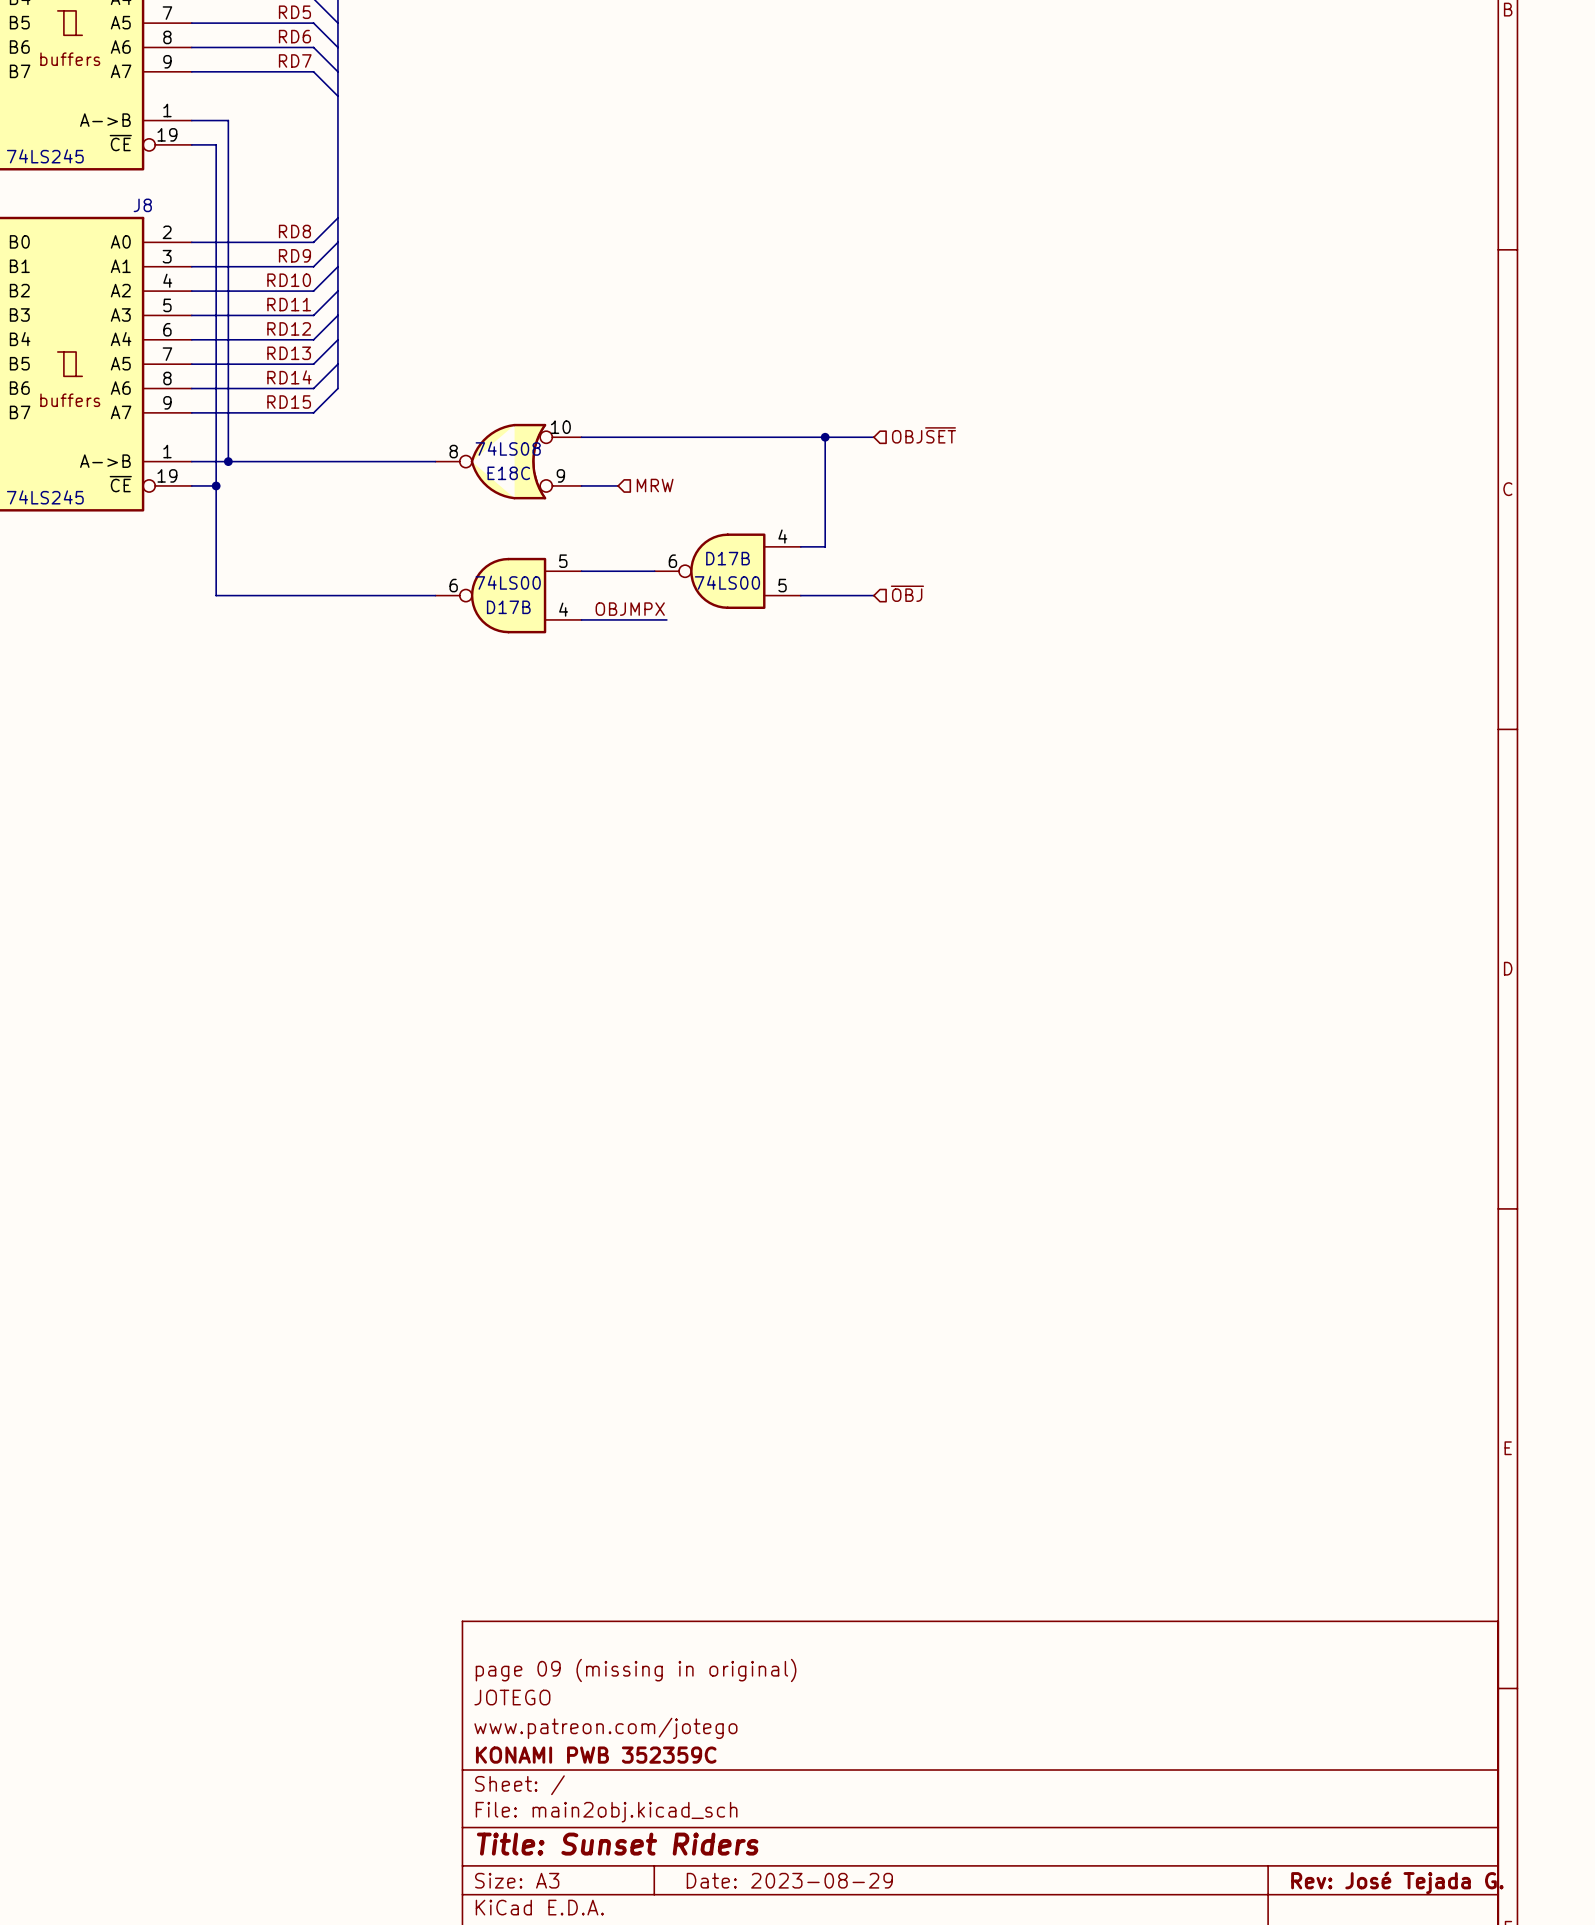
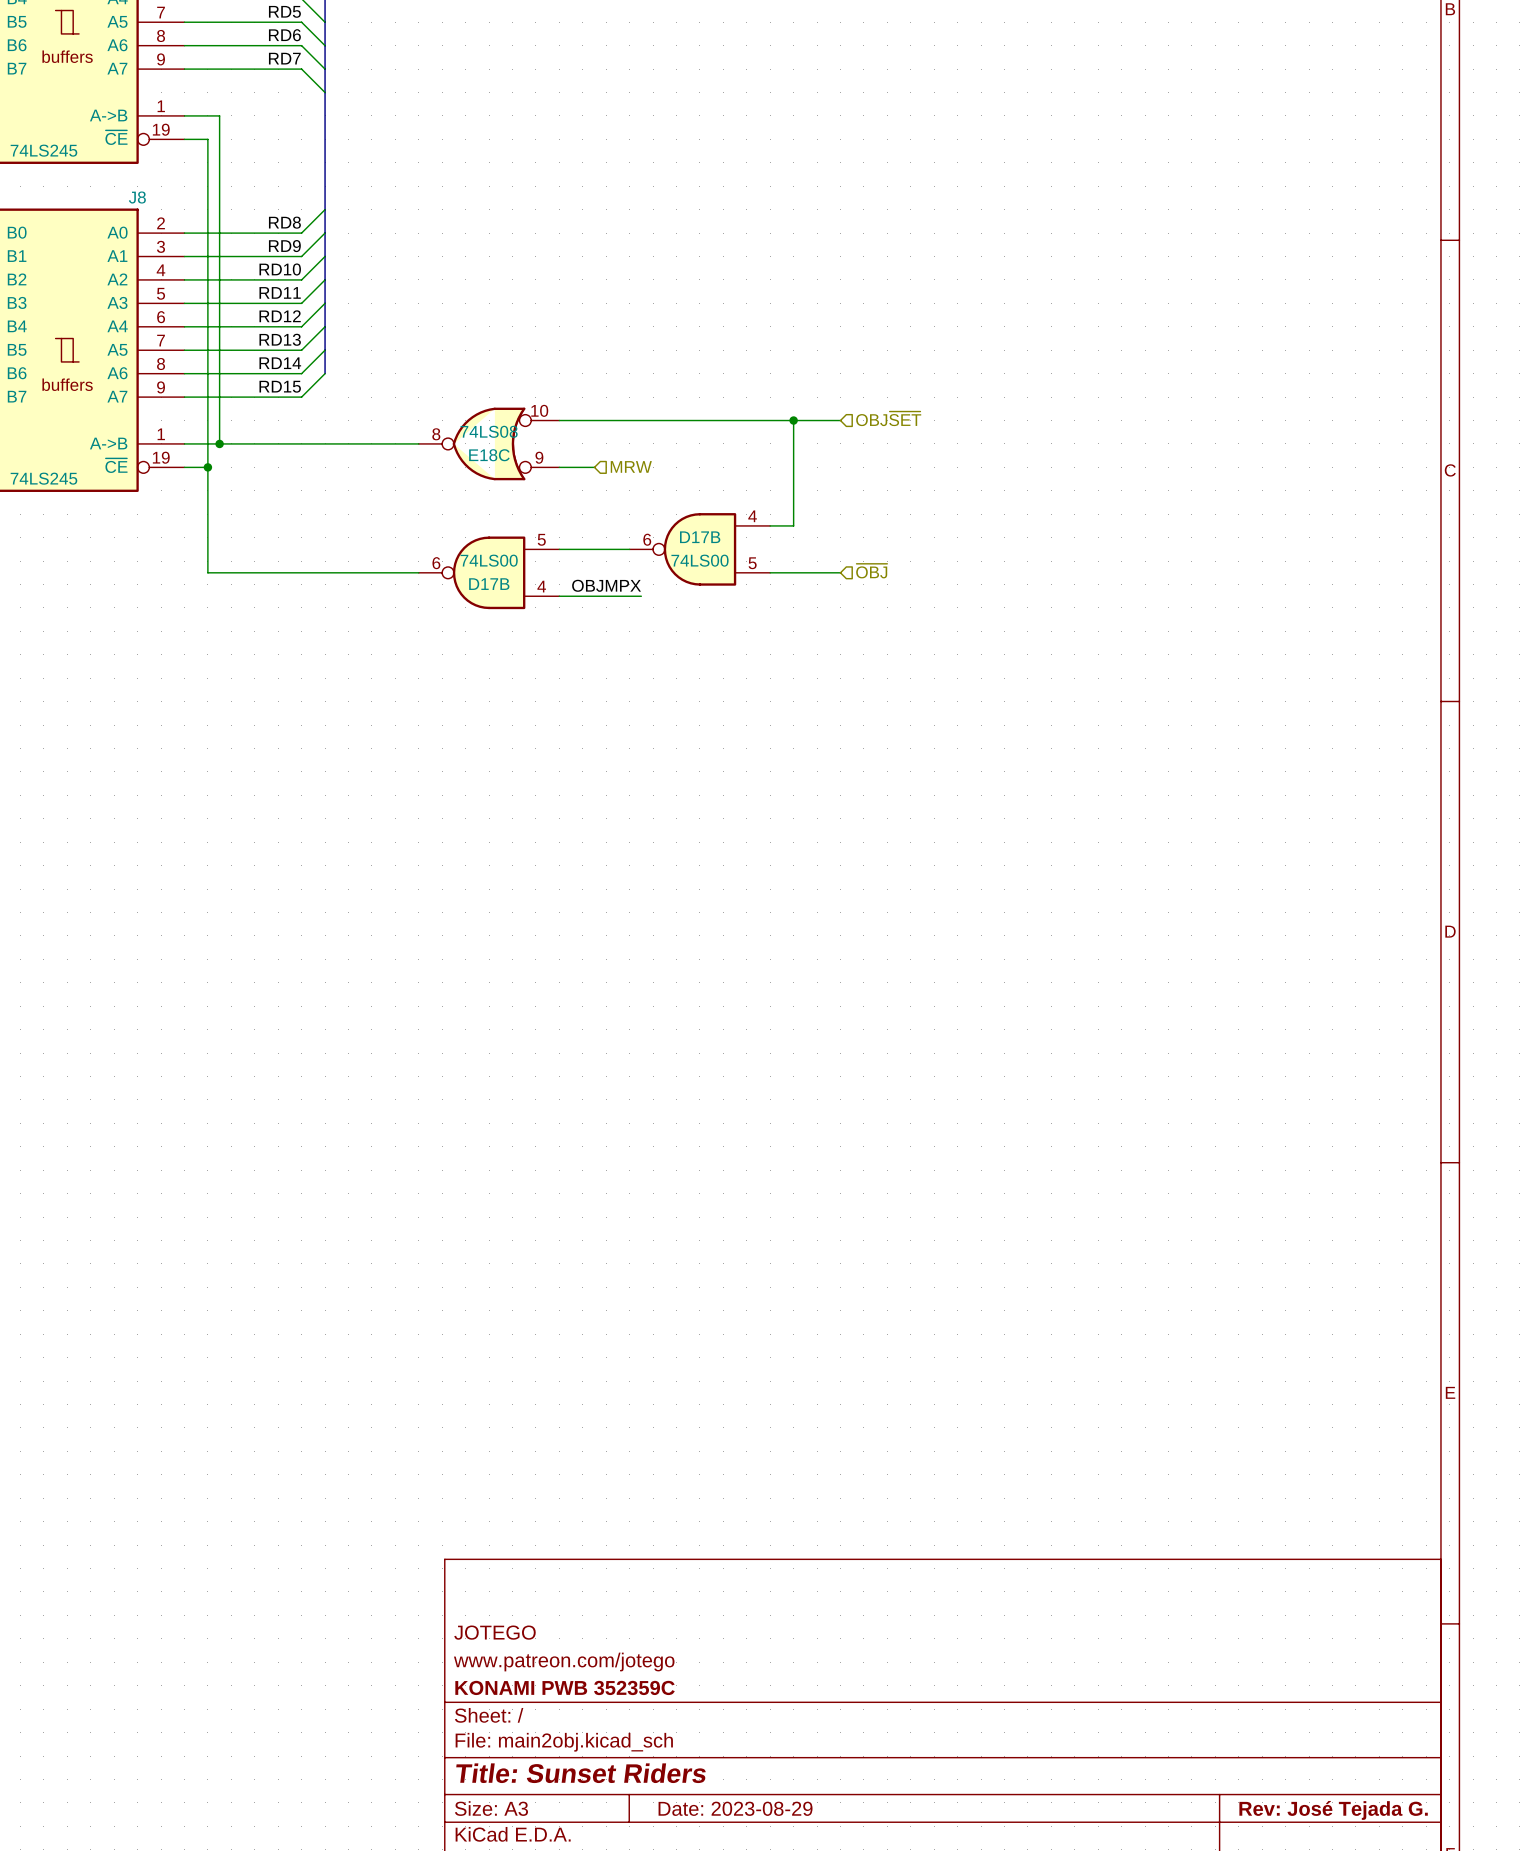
title block: page 09 (missing in original) (636, 1670) -> none

